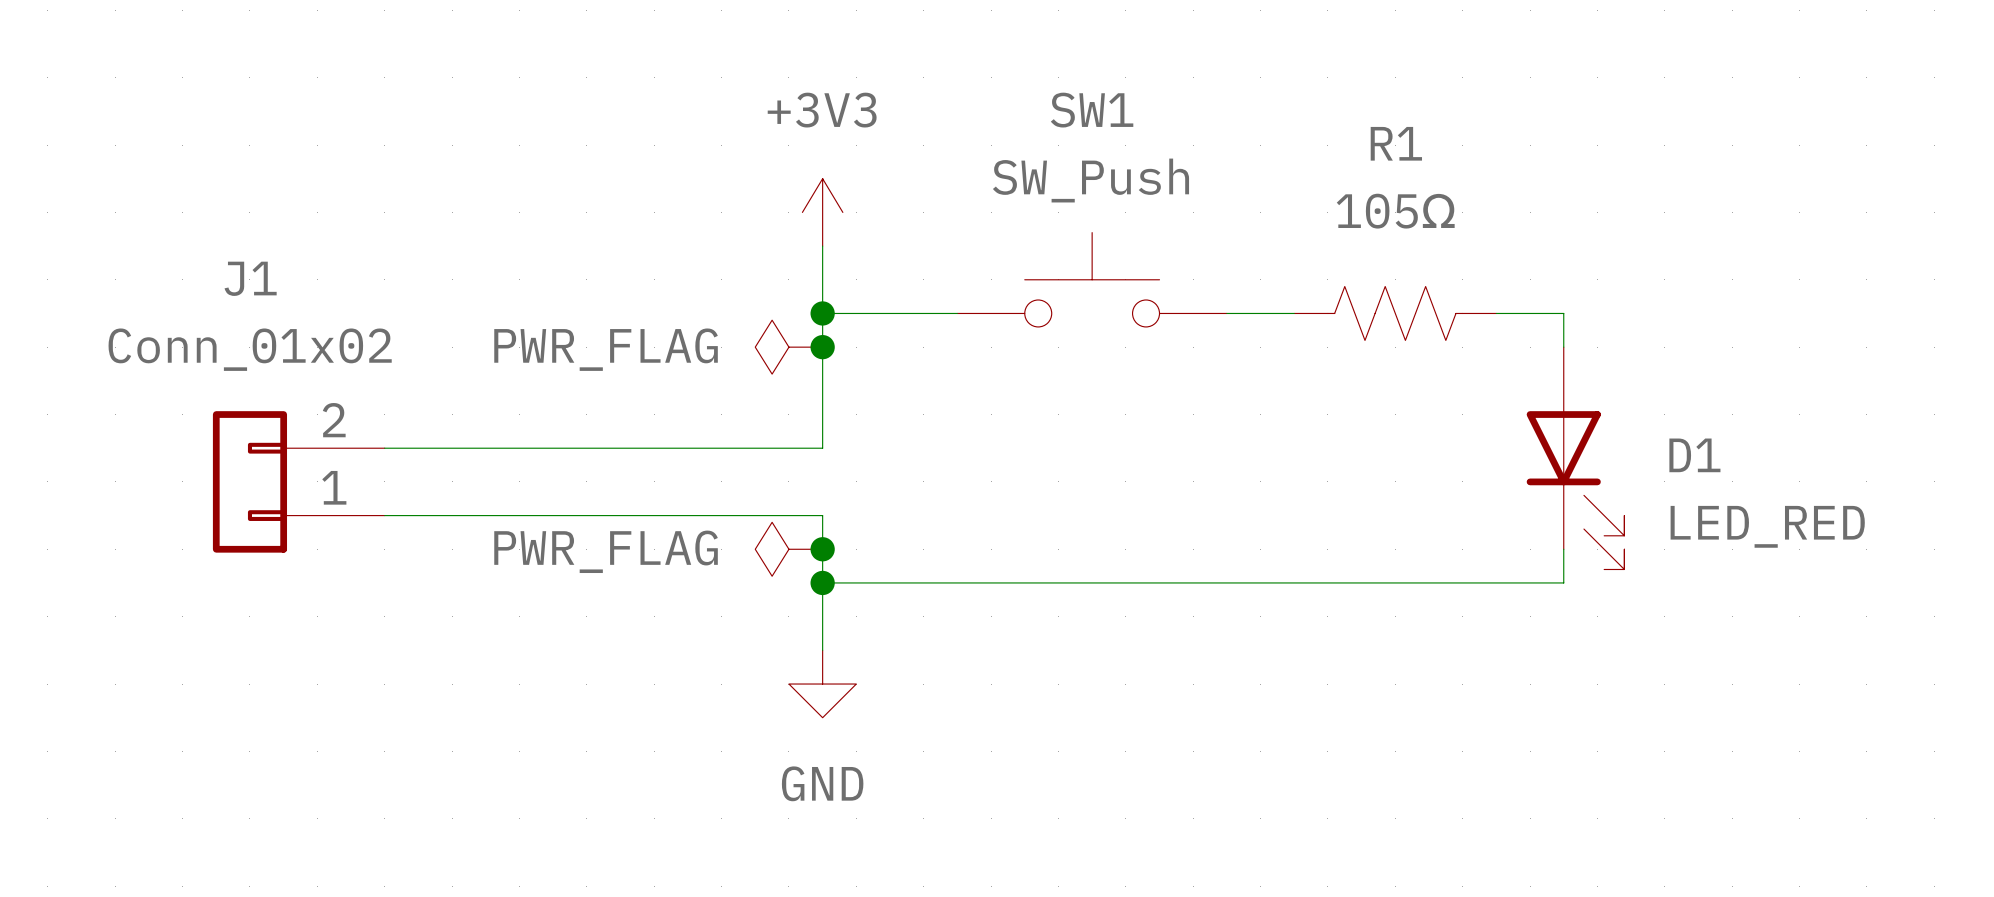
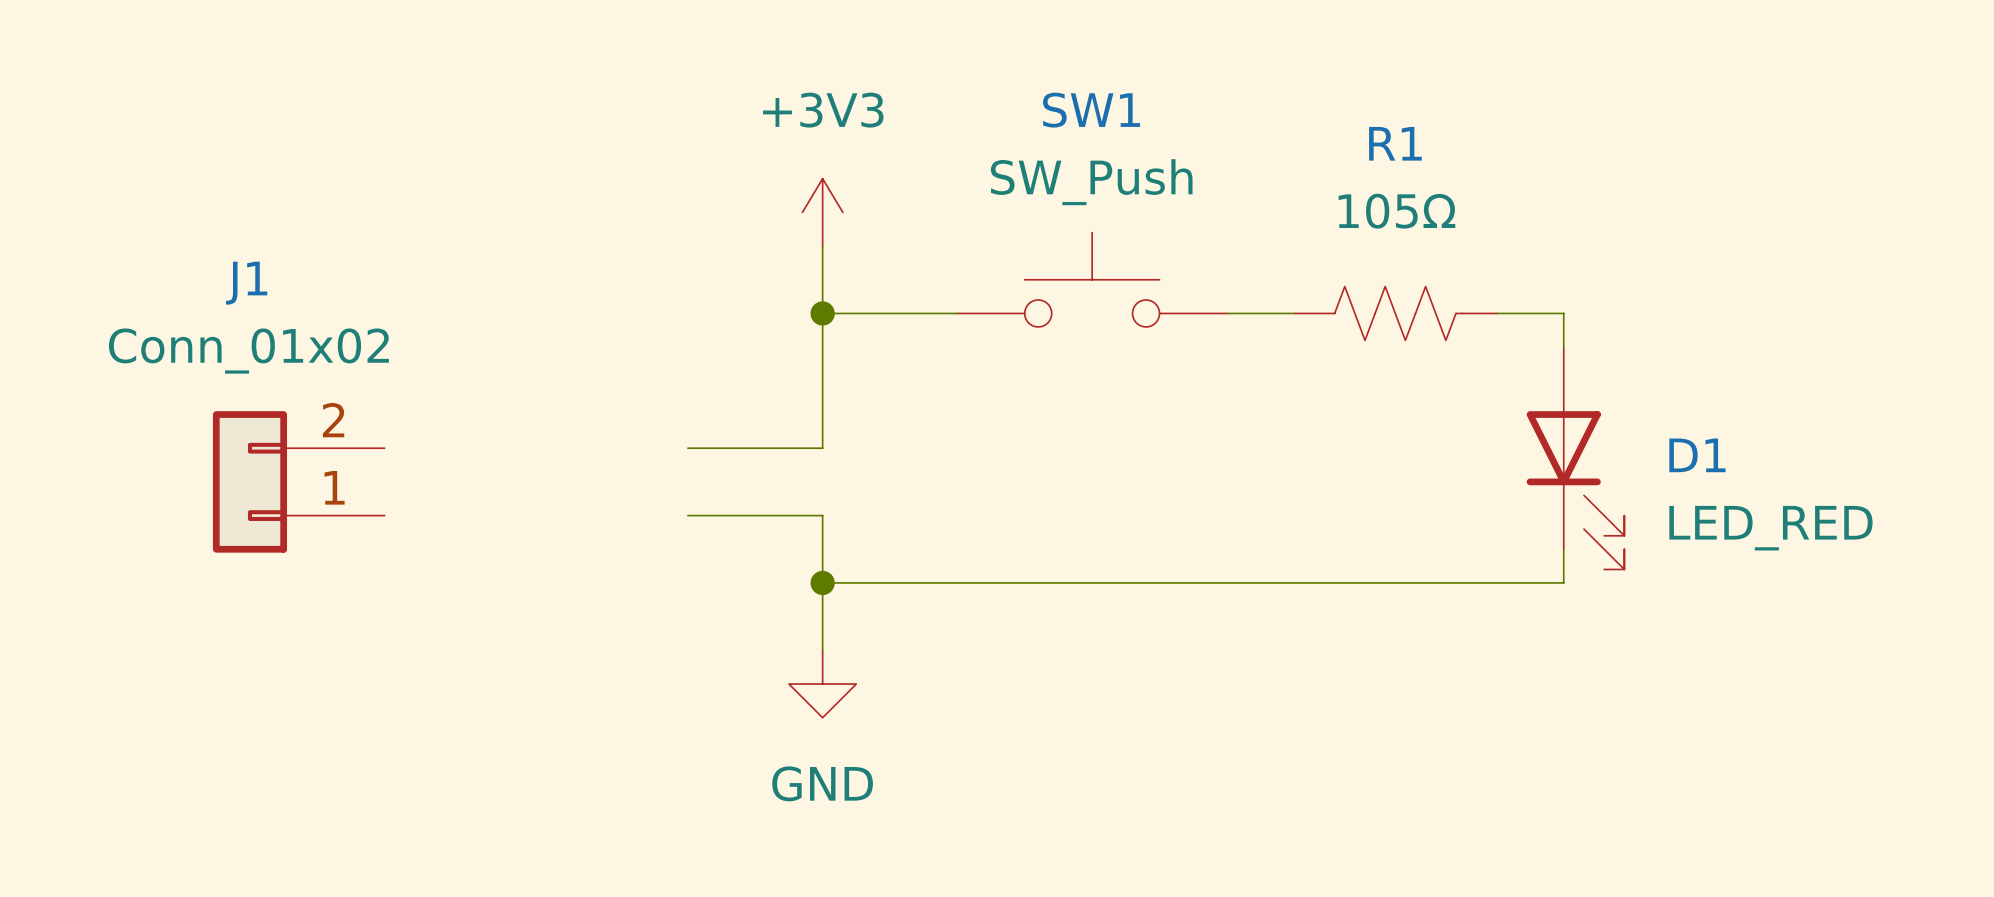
power symbol: PWR_FLAG (788, 347) -> none
junction: (822, 347) -> none
wire: (384, 448) (687, 448) -> none
wire: (384, 515) (687, 515) -> none
power symbol: PWR_FLAG (788, 549) -> none
junction: (822, 549) -> none

